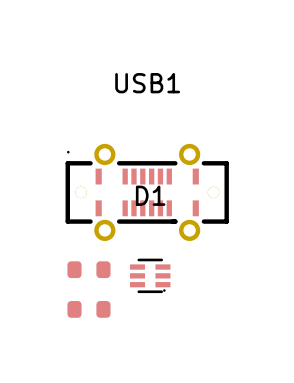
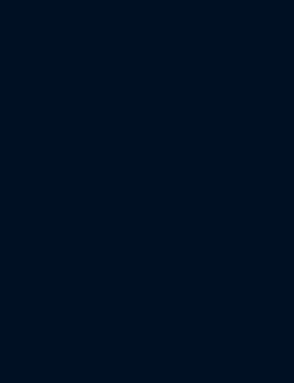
USB1: (147, 192) -> none
part: (88, 269) -> none
D1: (150, 276) -> none
part: (88, 309) -> none

